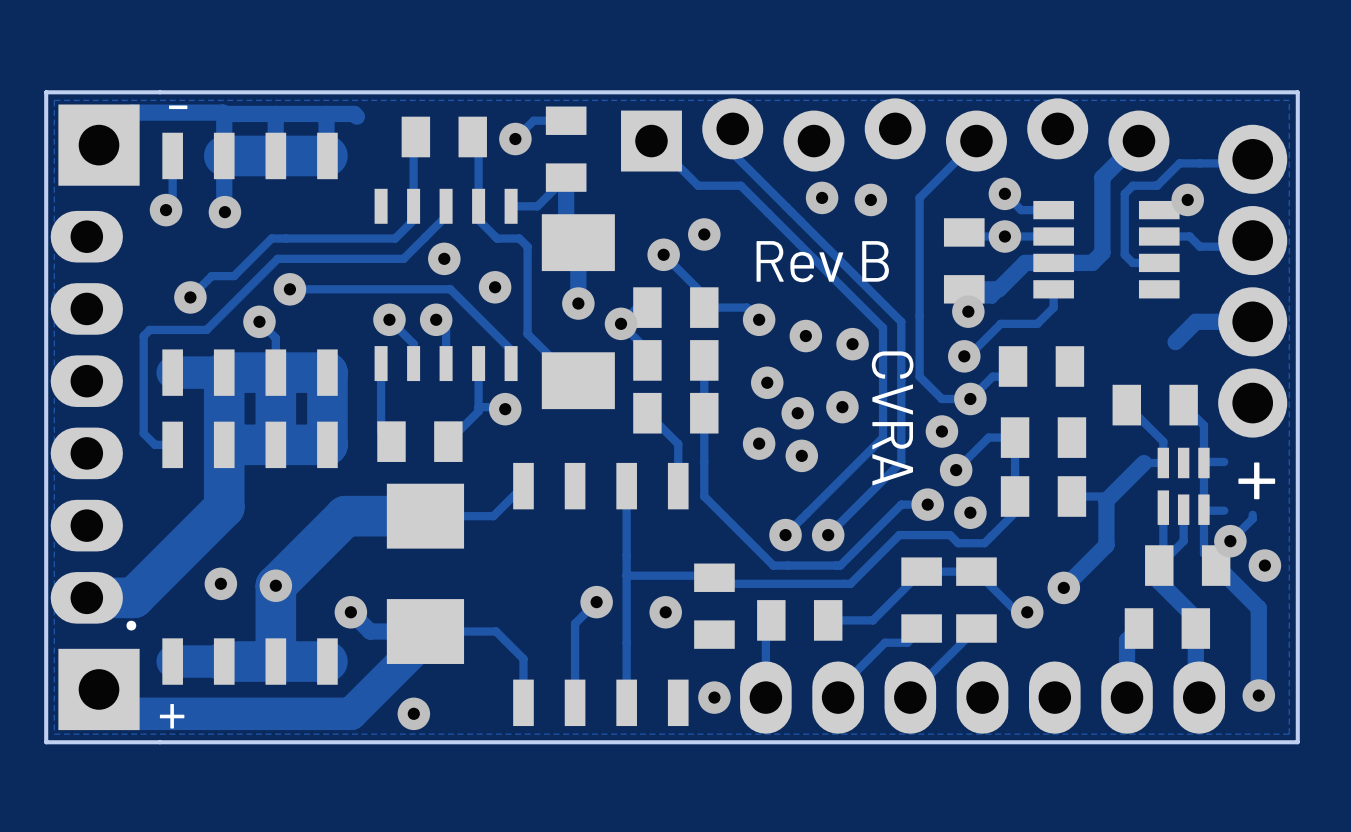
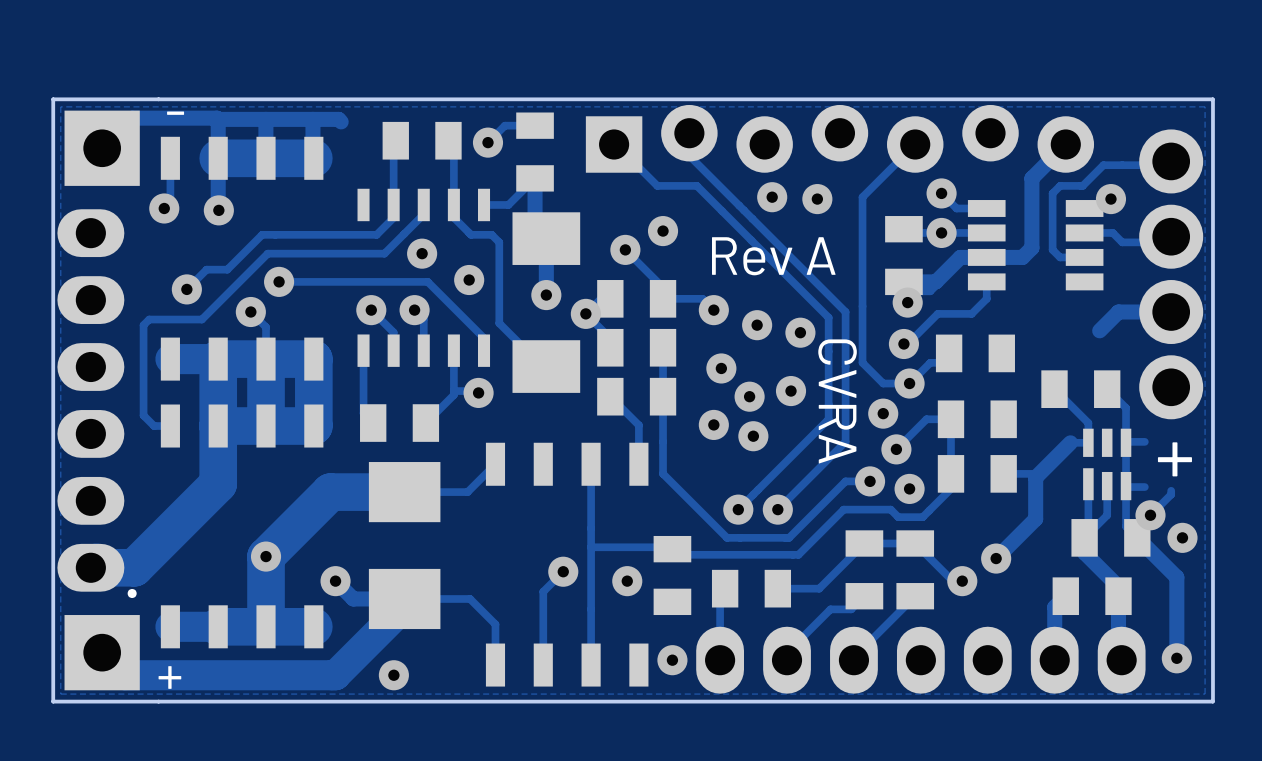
text: Rev B (822, 261) -> Rev A (773, 256)
via: (220, 583) -> none

